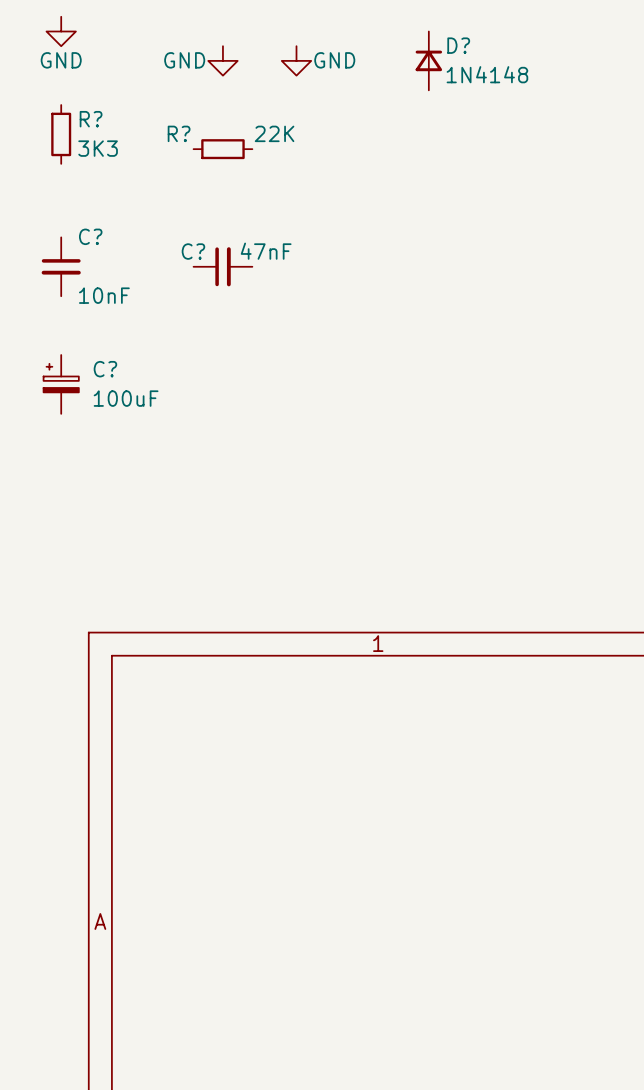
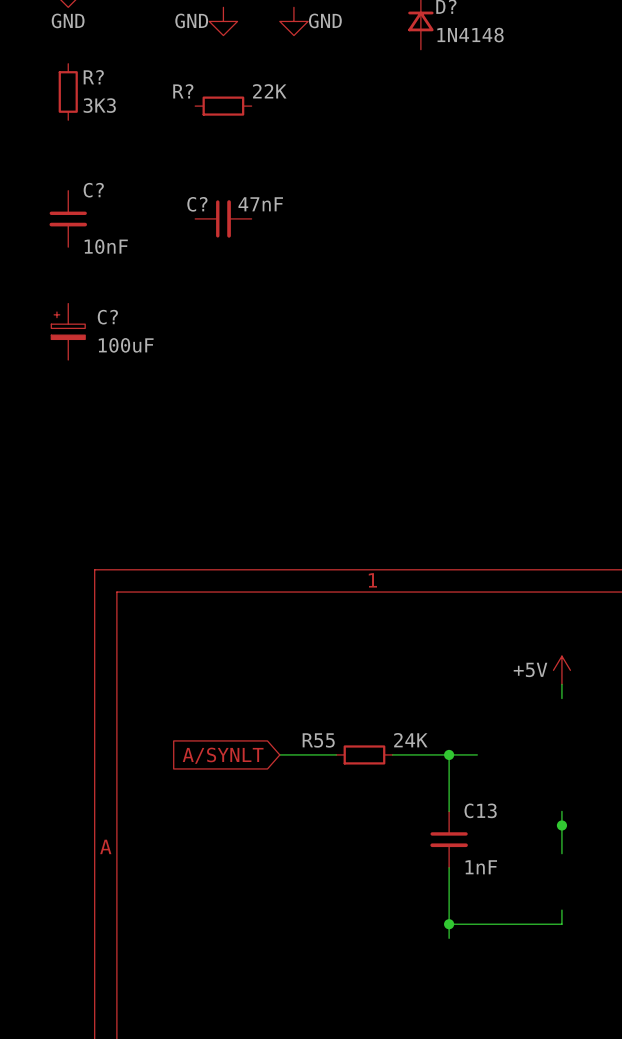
power symbol: none -> +5V (561, 670)
wire: none -> (561, 684) (561, 698)
wire: none -> (279, 754) (336, 754)
R55: none -> 24K (364, 754)
wire: none -> (392, 754) (477, 754)
wire: none -> (449, 754) (449, 811)
junction: none -> (449, 754)
global label: none -> A/SYNLT (223, 755)
wire: none -> (561, 811) (561, 853)
junction: none -> (561, 825)
C13: none -> 1nF (449, 839)
wire: none -> (449, 867) (449, 938)
wire: none -> (561, 910) (561, 924) (449, 924)
junction: none -> (449, 924)

